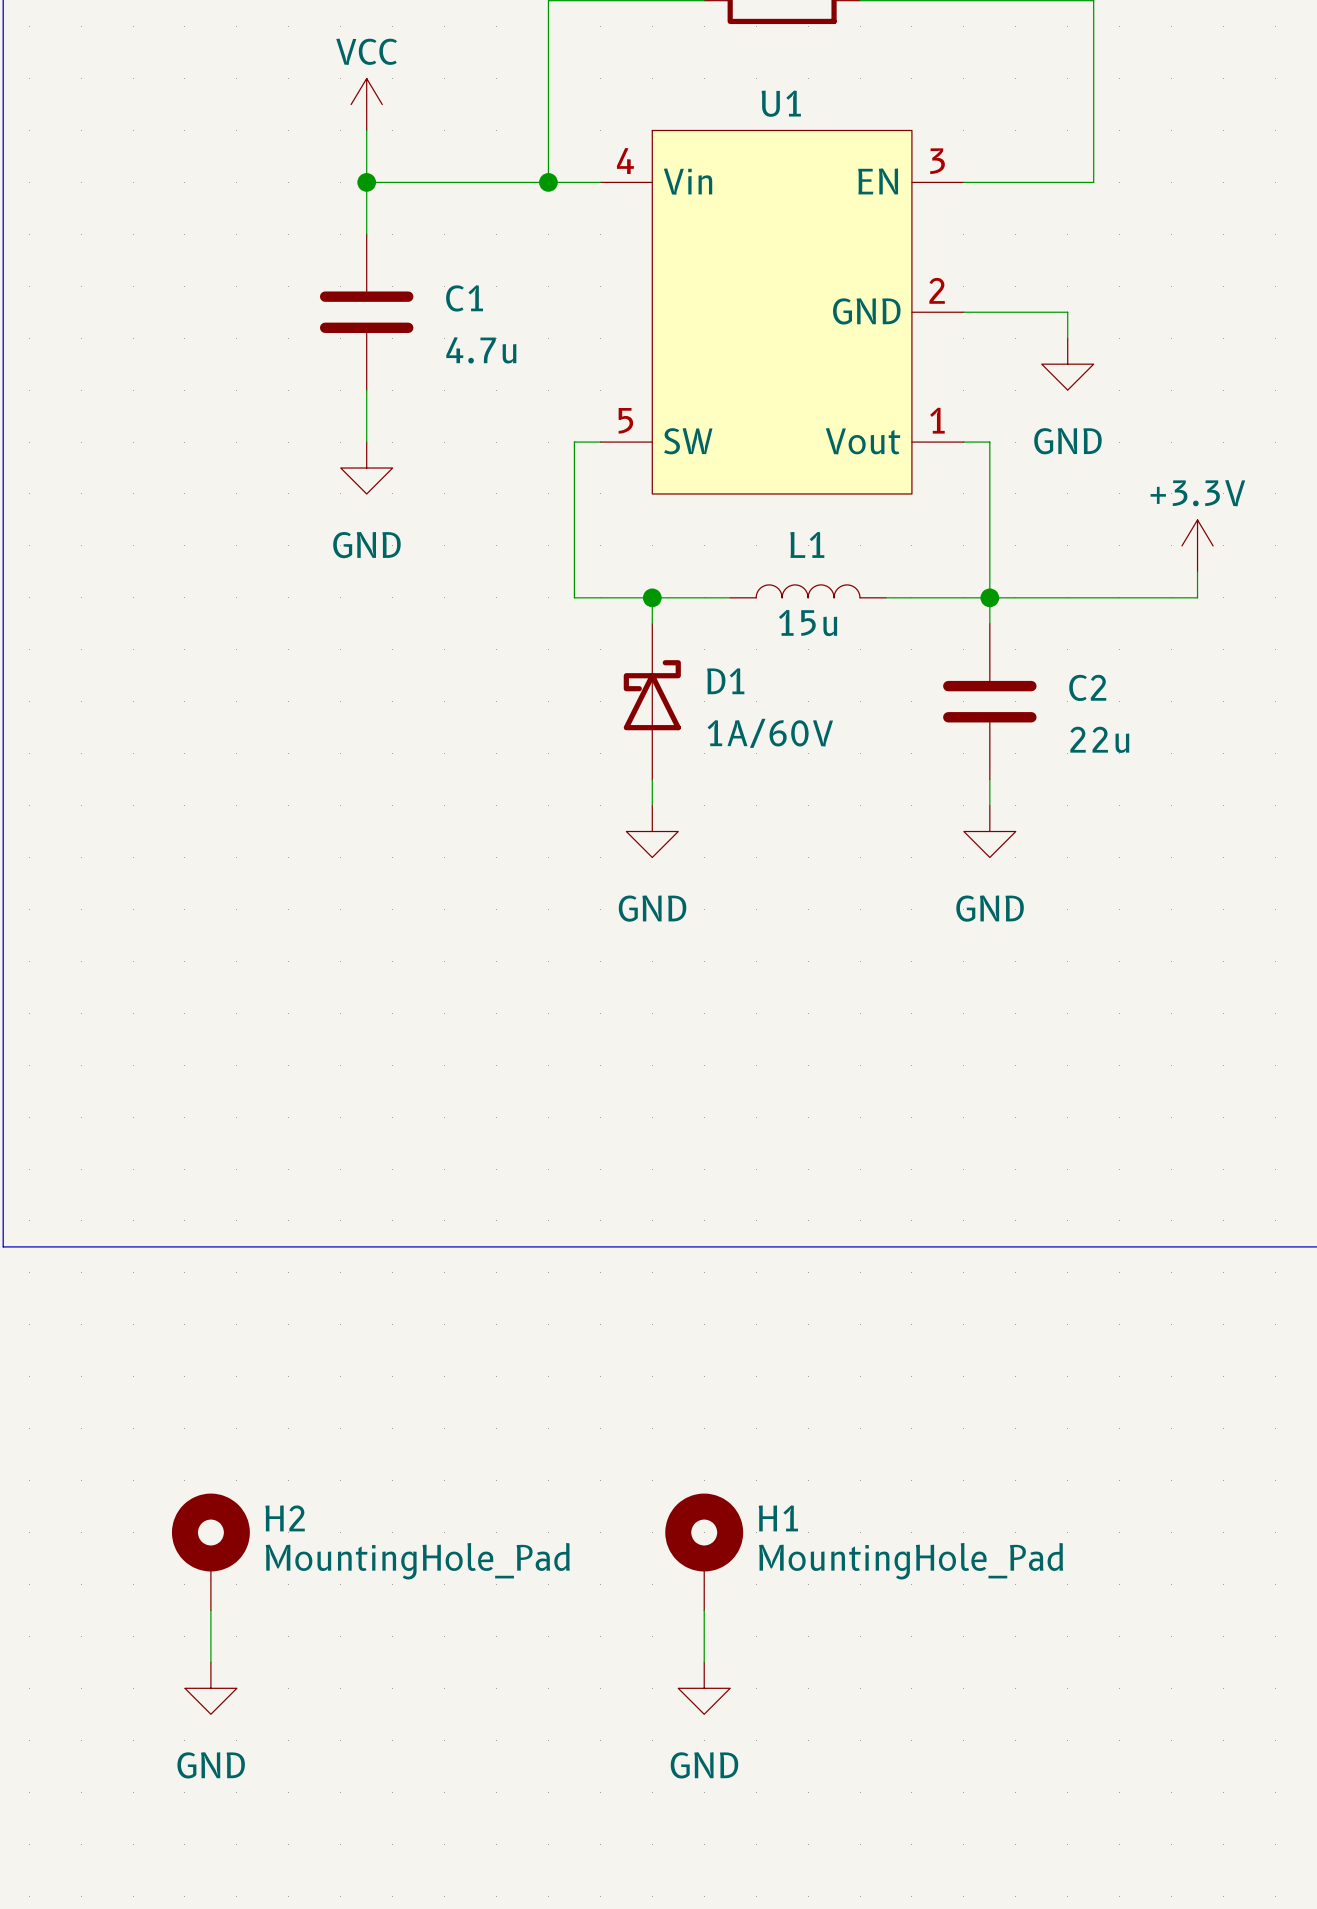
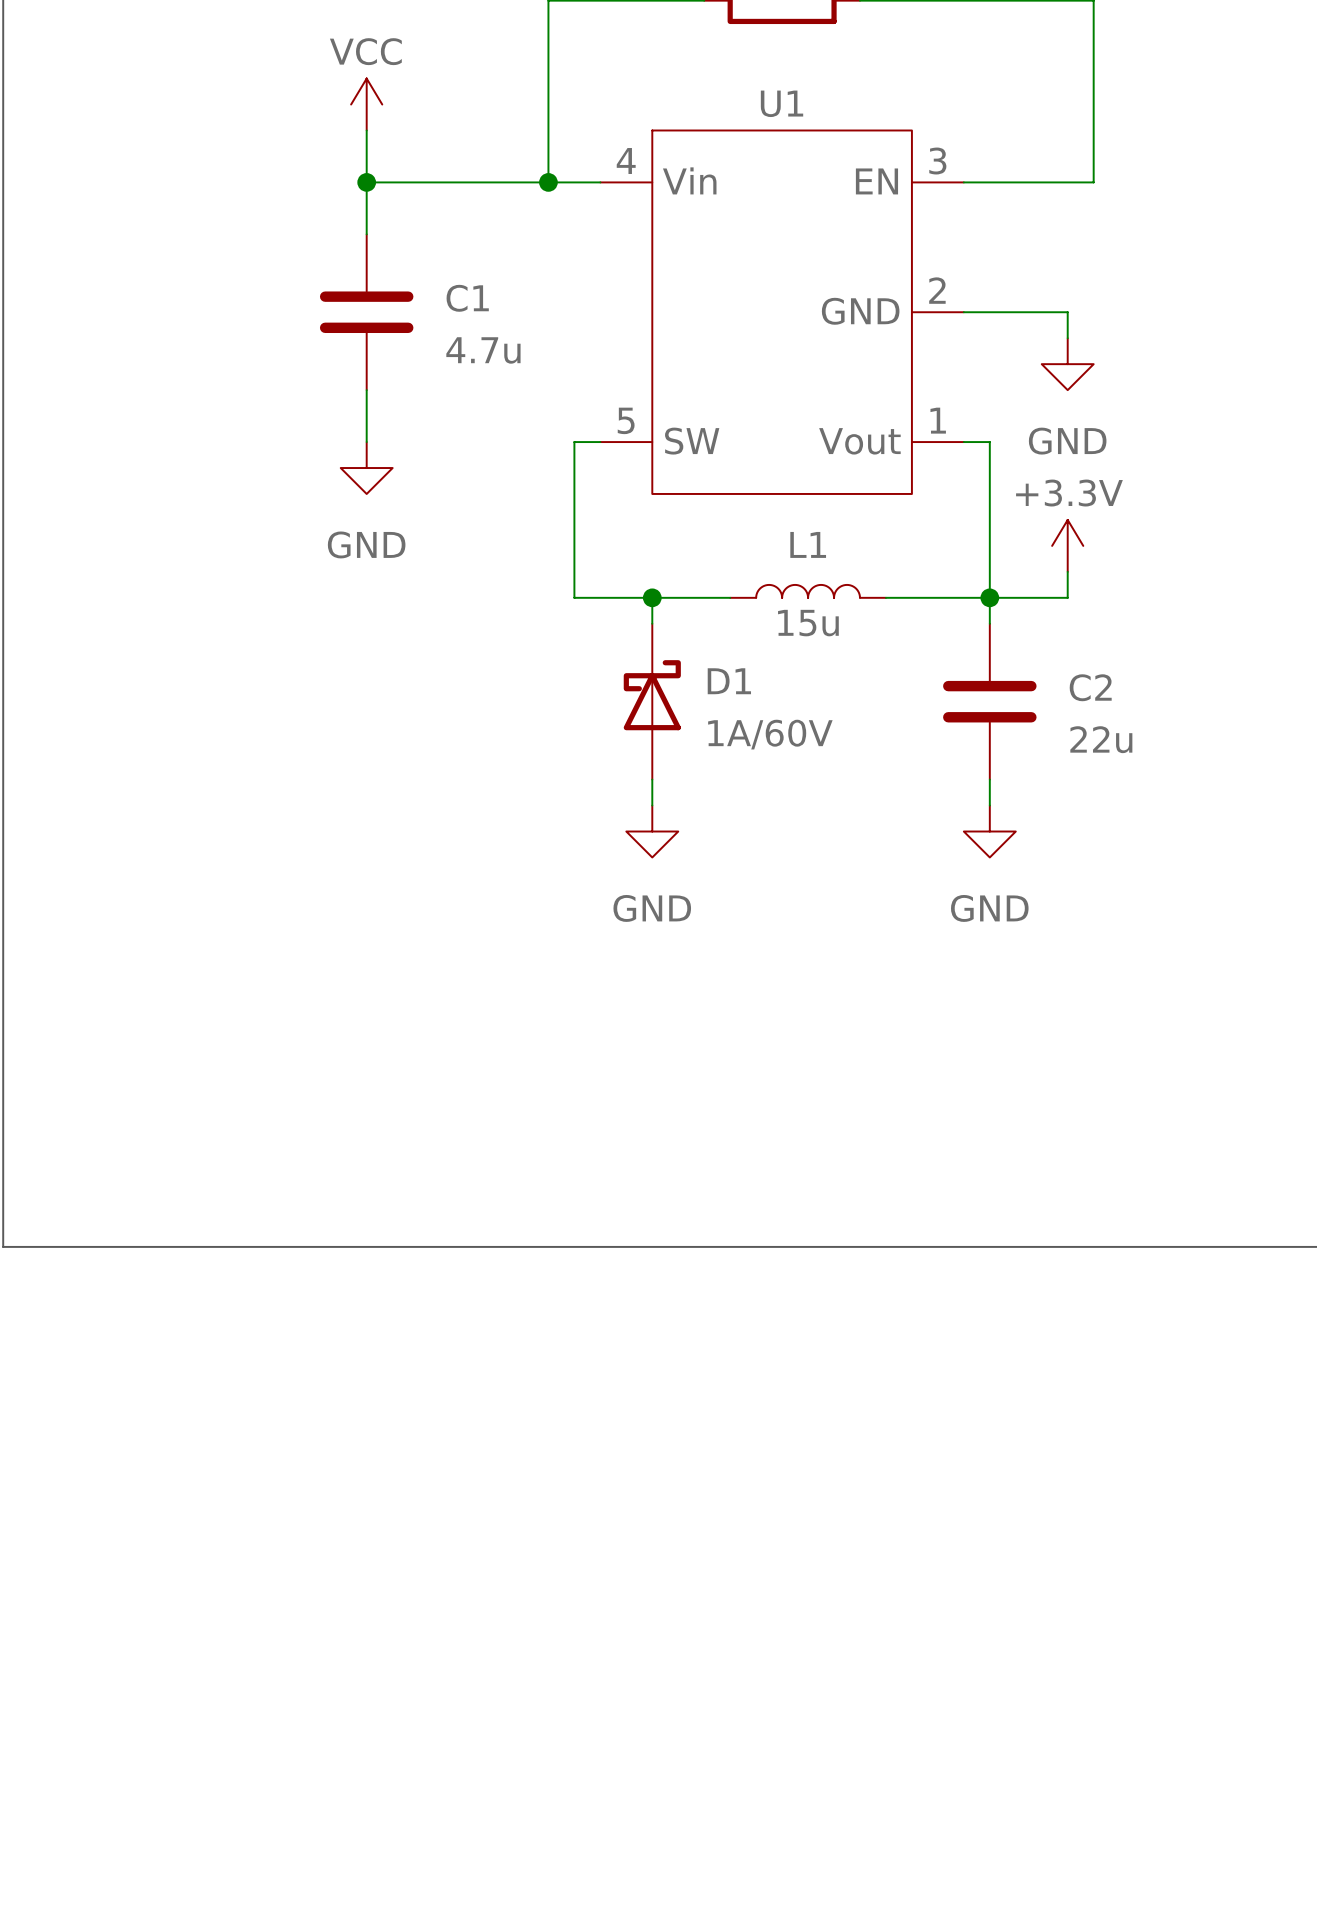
power symbol position: +3.3V (1197, 545) -> +3.3V (1067, 545)
wire: (1197, 571) (1197, 597) (1067, 597) -> (1067, 571) (1067, 597)
H2: MountingHole_Pad (210, 1552) -> none
H1: MountingHole_Pad (704, 1552) -> none
wire: (210, 1610) (210, 1662) -> none
wire: (704, 1610) (704, 1662) -> none
power symbol: GND (210, 1688) -> none
power symbol: GND (704, 1688) -> none

